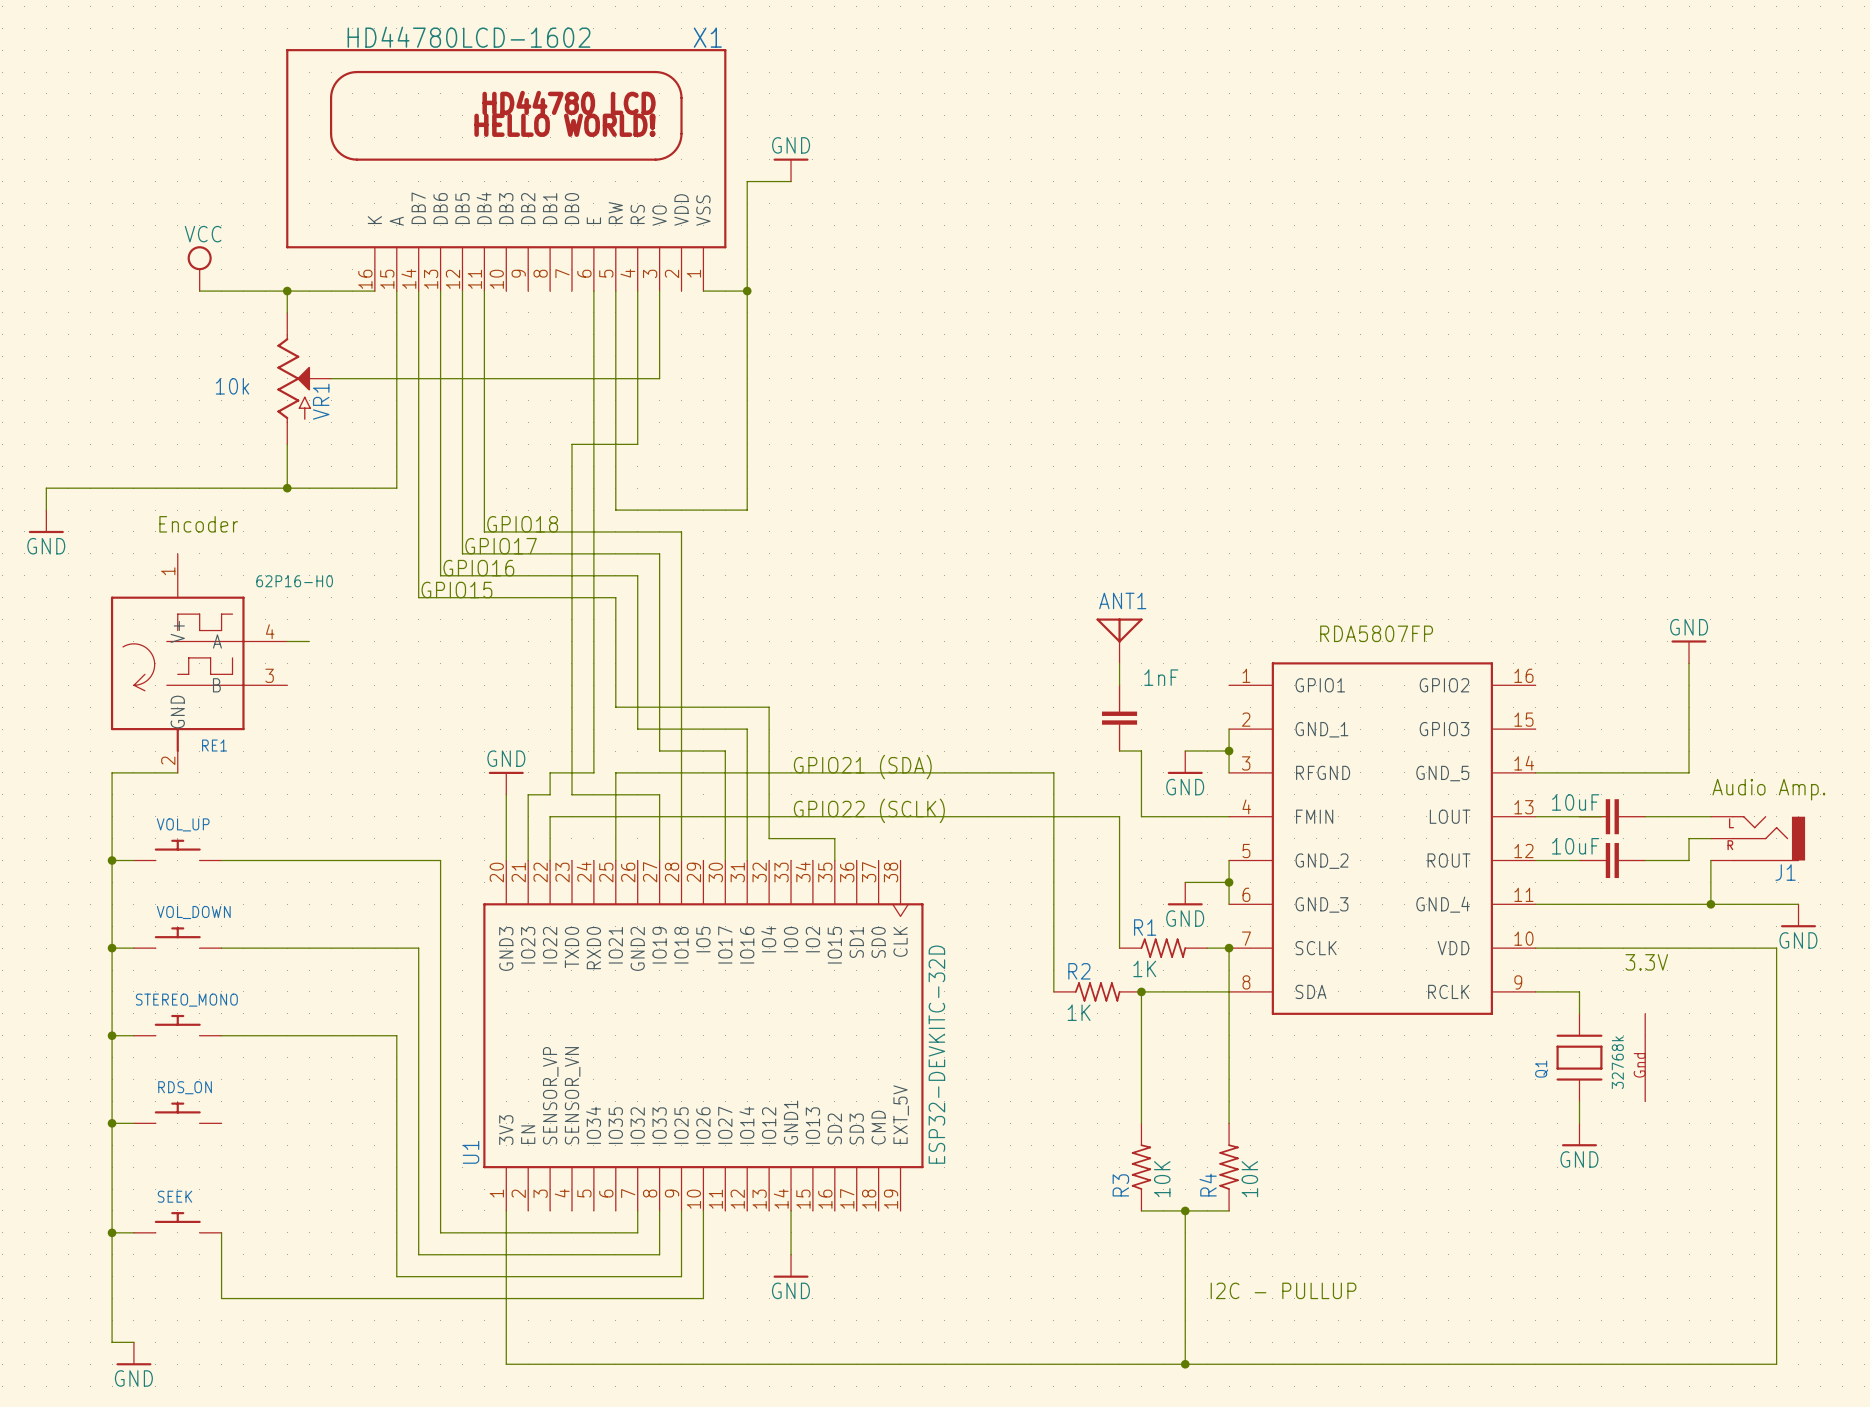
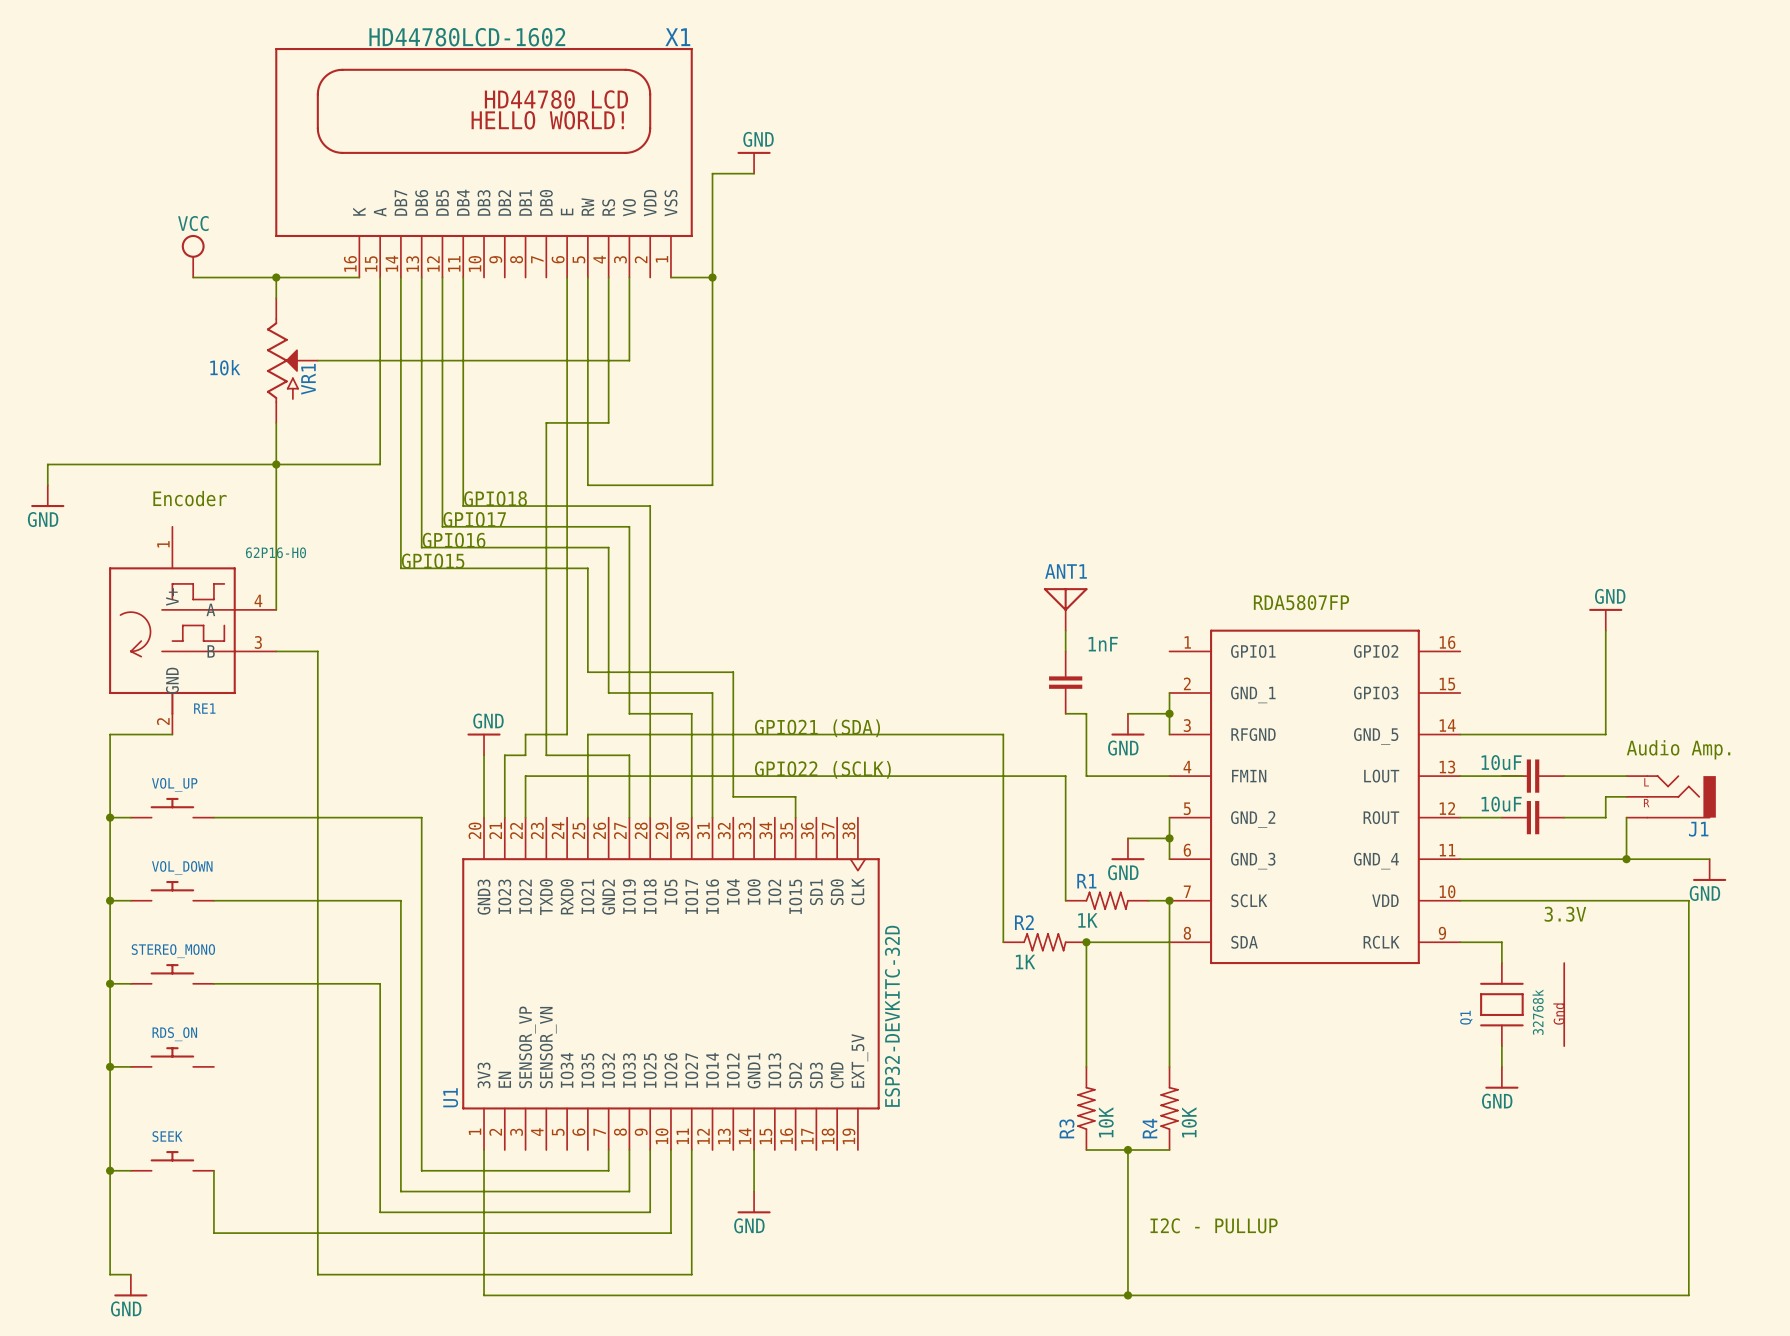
wire: (287, 641) (309, 641) -> (276, 609) (276, 464)
wire: none -> (276, 651) (317, 651) (317, 1274) (691, 1274) (691, 1150)

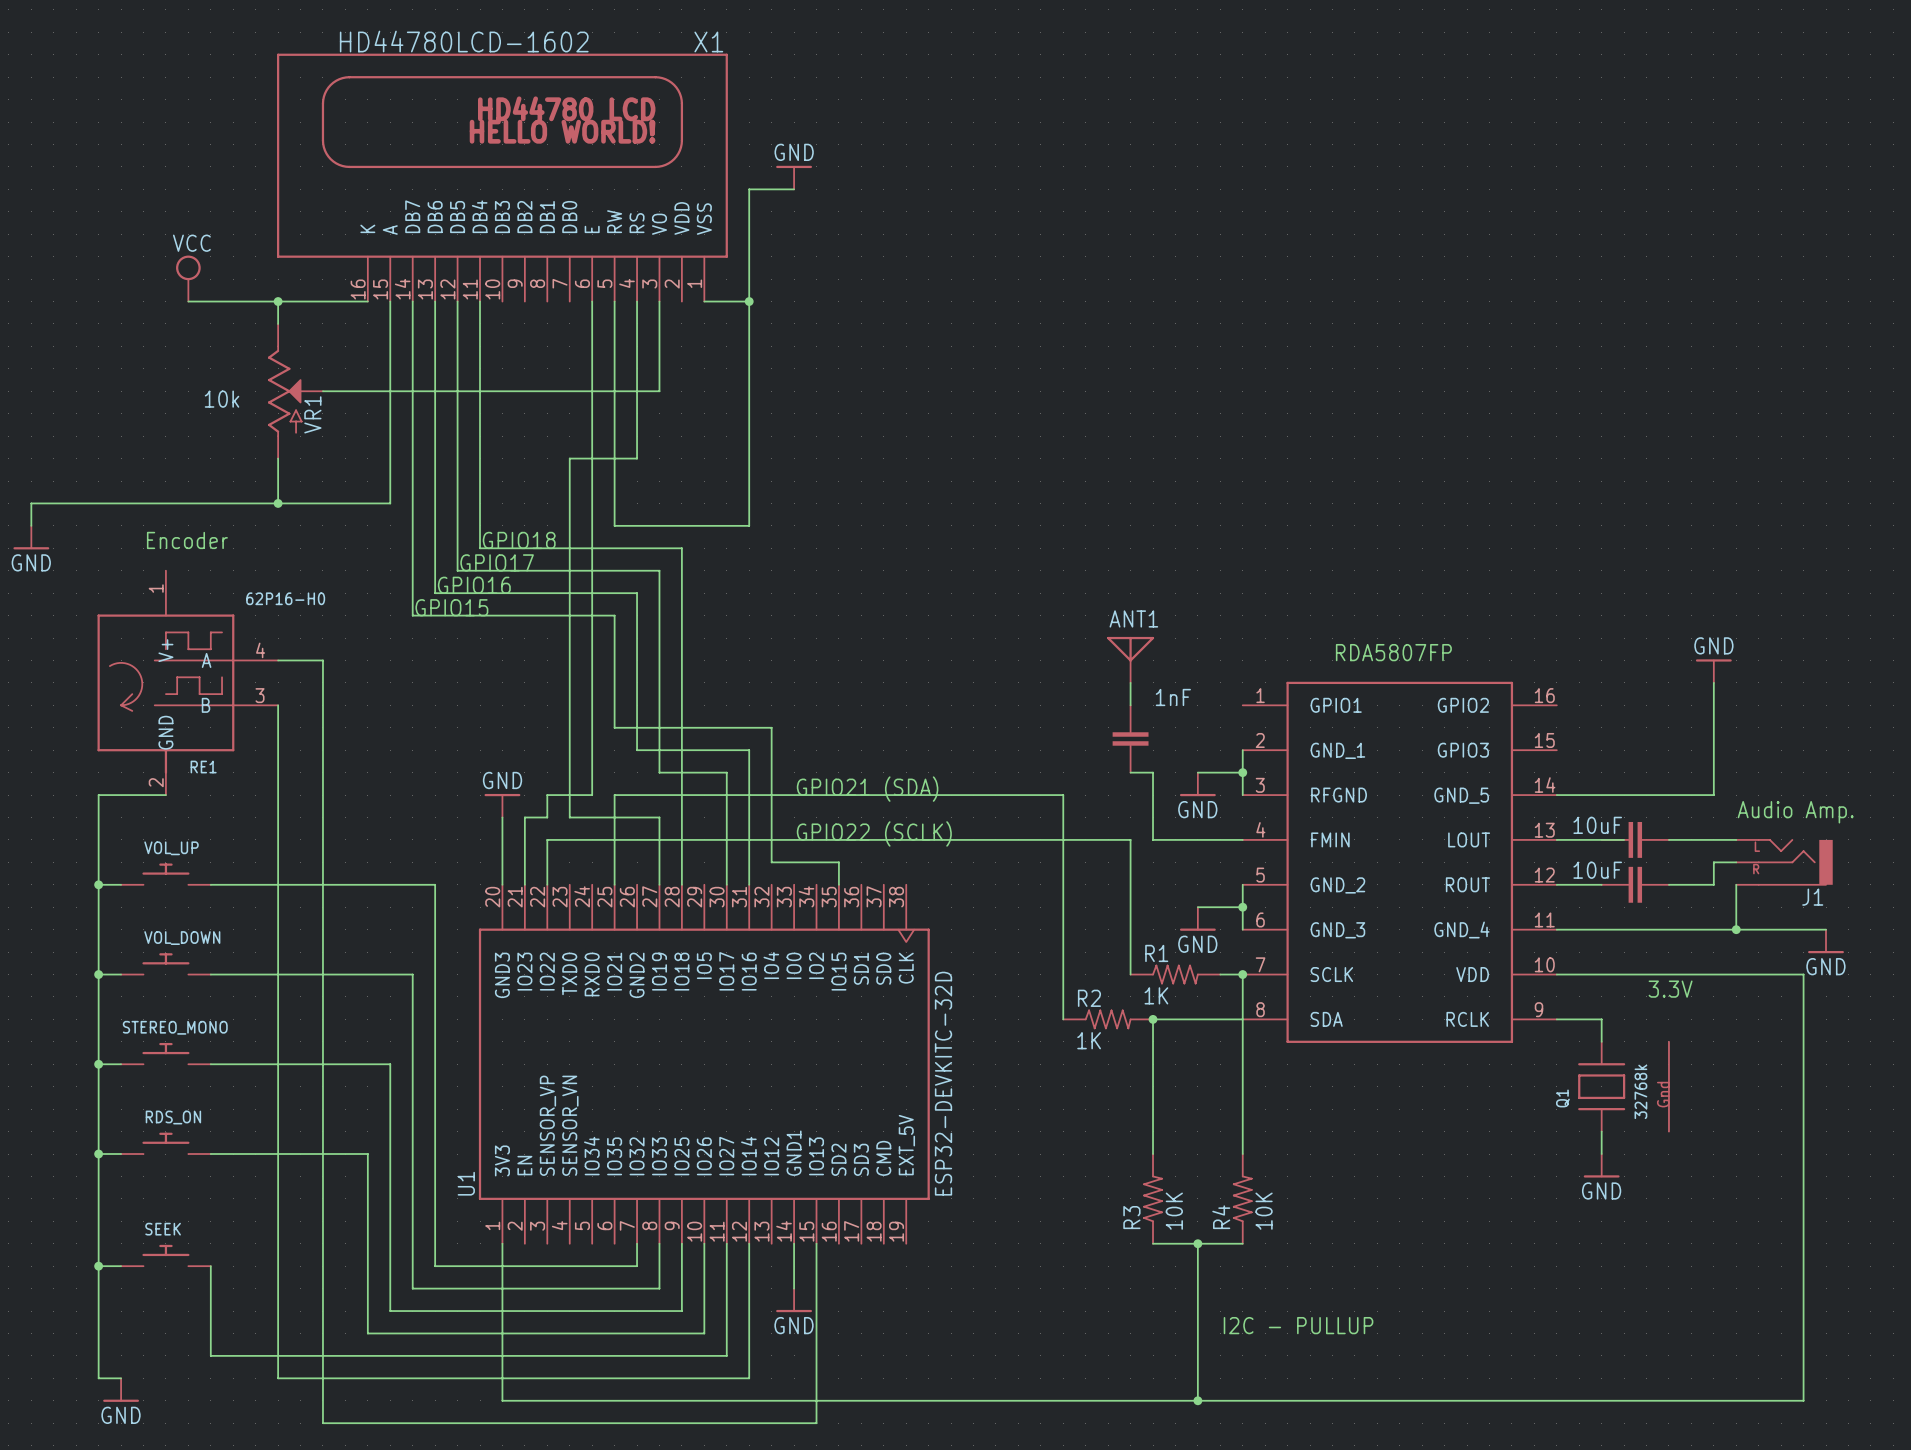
wire: (276, 464) (276, 609) -> none
wire: (276, 651) (317, 651) -> (278, 660) (322, 660) (322, 705)
wire: none -> (278, 705) (278, 1378) (322, 1378) (322, 1423) (816, 1423) (816, 1243)
wire: (213, 1233) (359, 1233) -> (210, 1154) (367, 1154) (367, 1333)
wire: none -> (210, 1333) (210, 1355) (726, 1355)
wire: (691, 1253) (691, 1274) -> (749, 1243) (749, 1378) (726, 1378)

